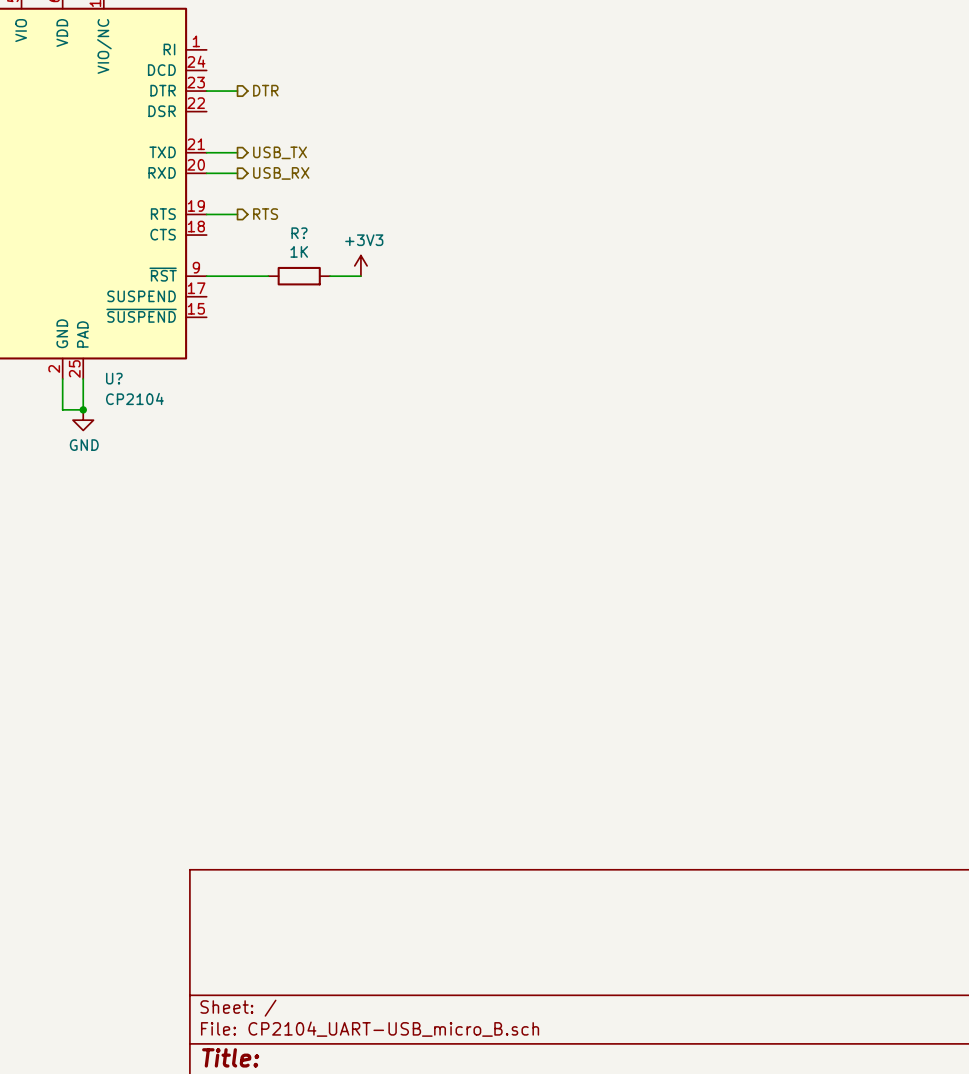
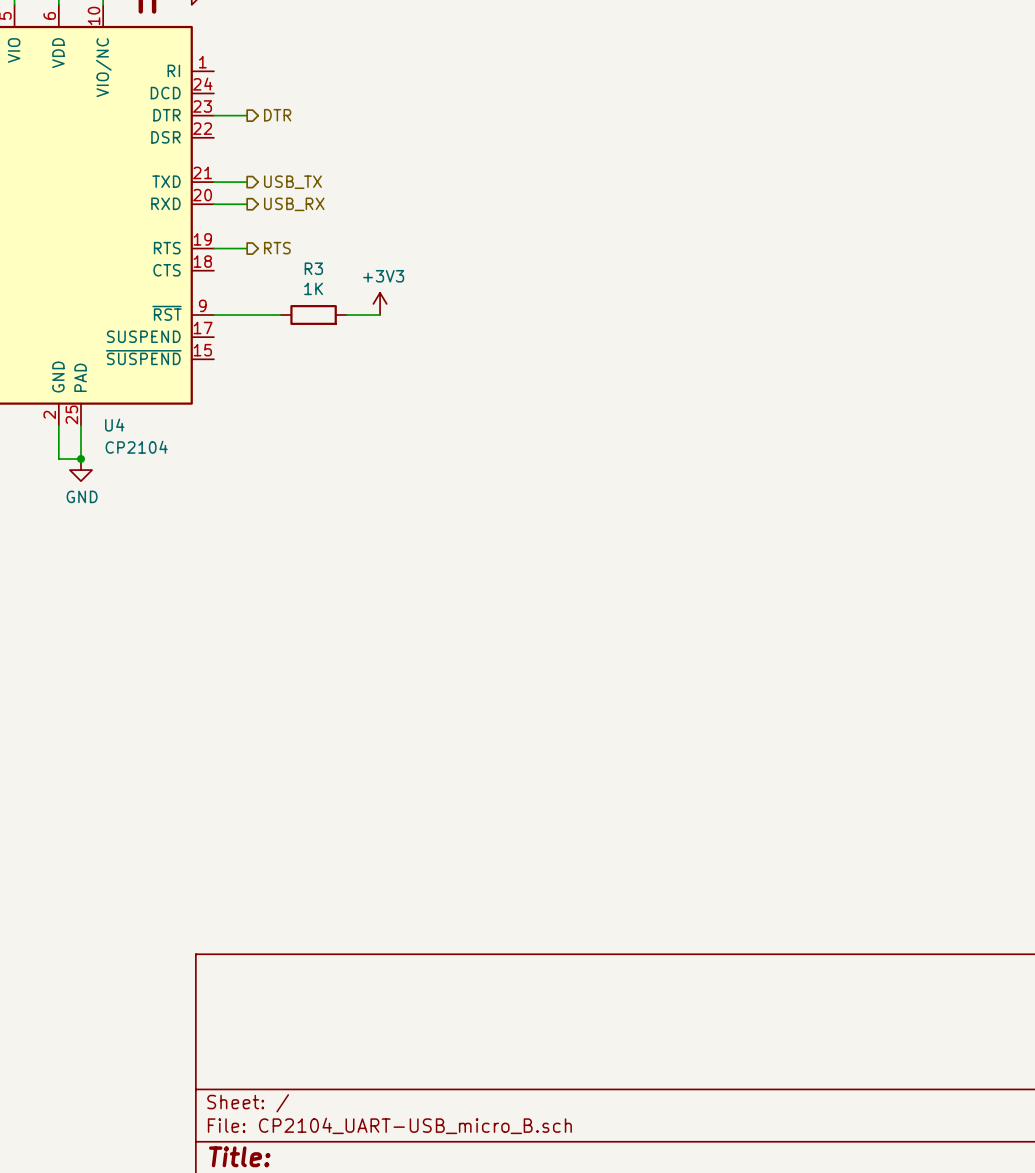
R? name: R? (299, 233) -> R3 (313, 268)
U? name: U? (114, 378) -> U4 (114, 425)

